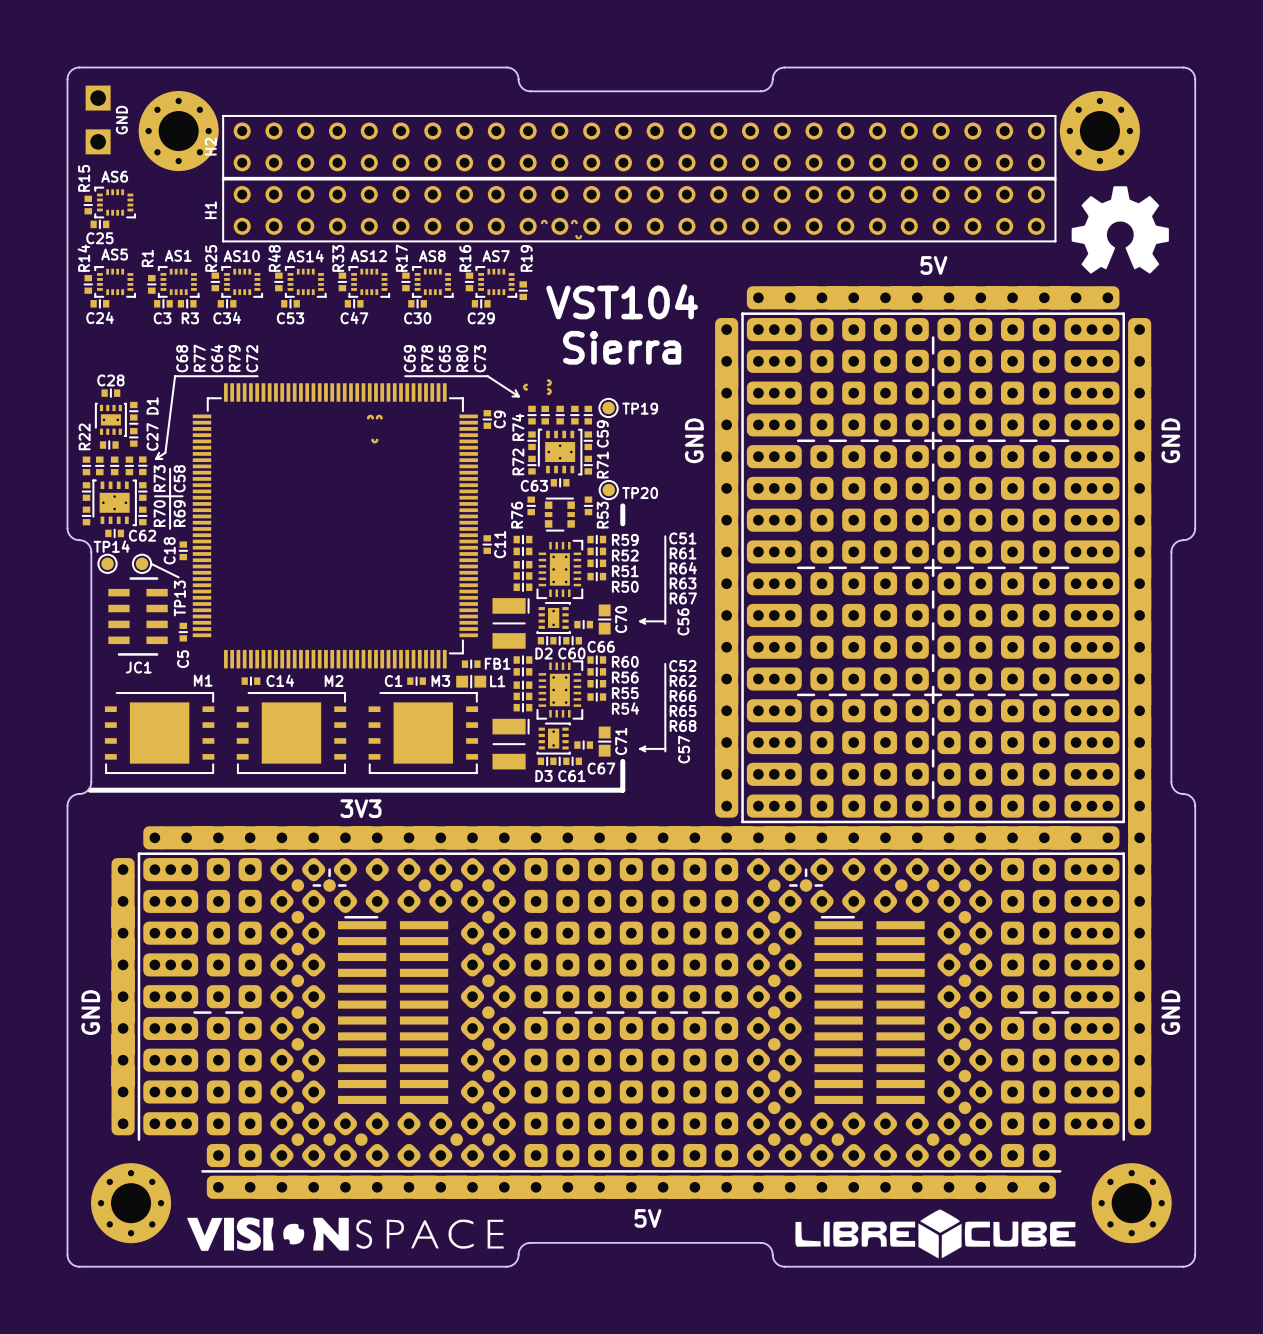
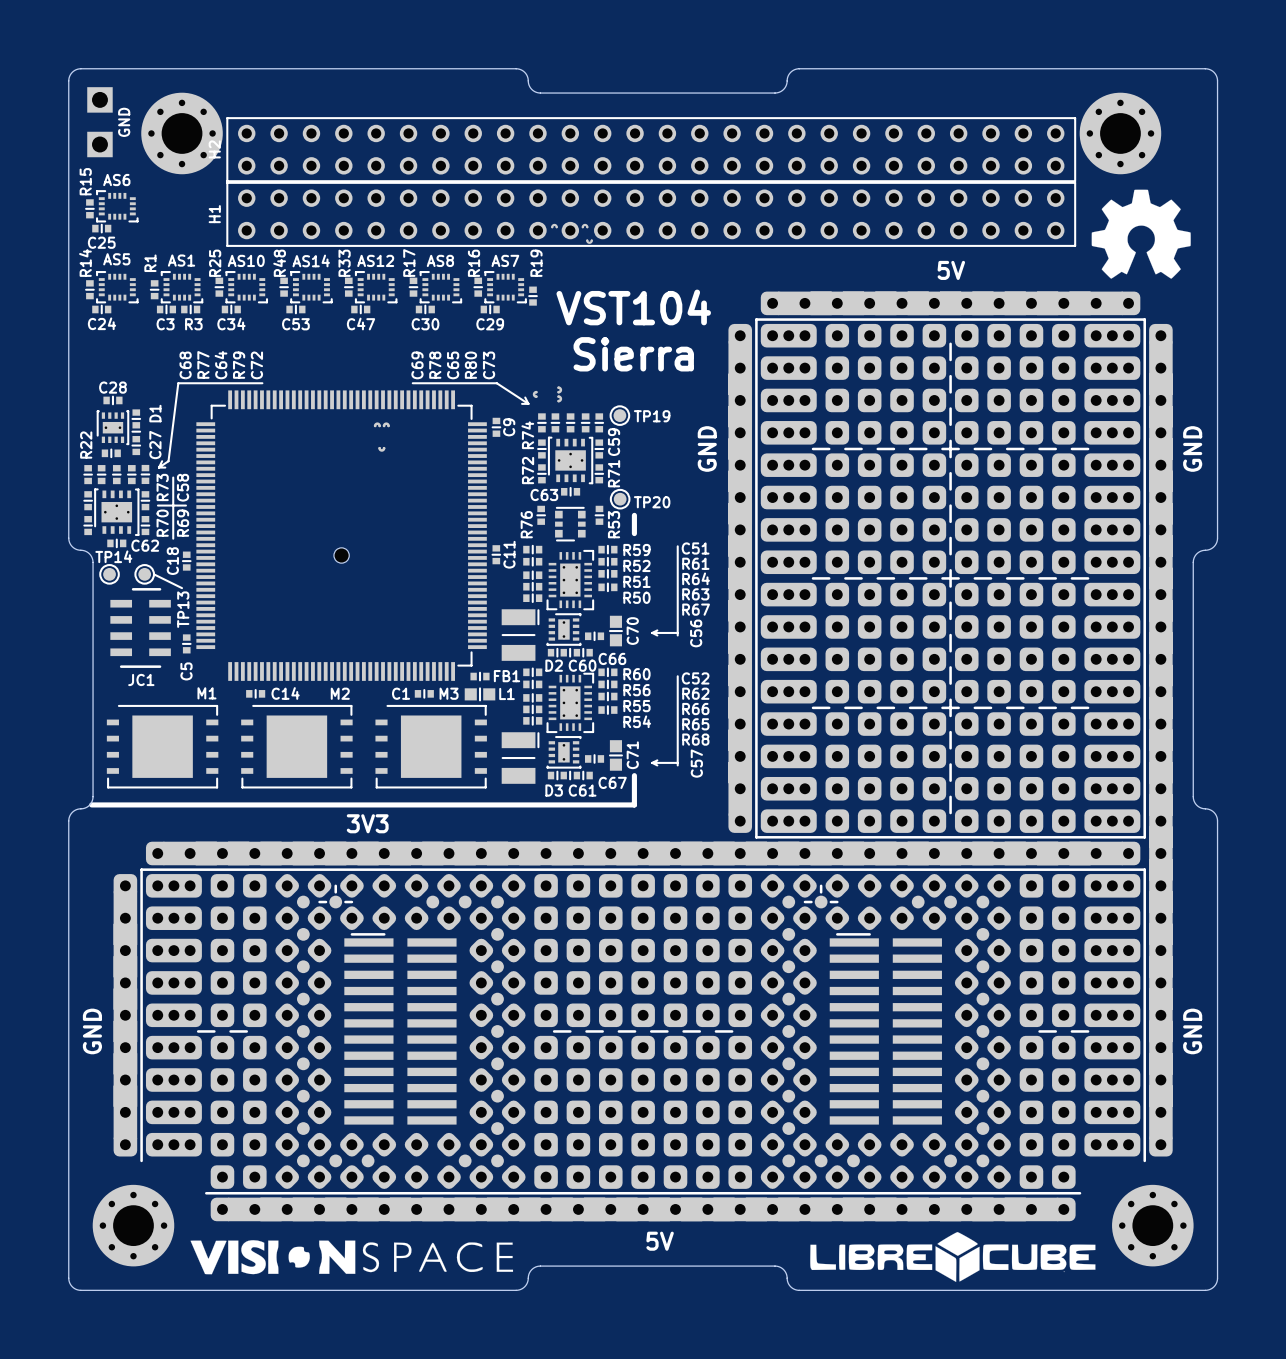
part: none -> (341, 555)

